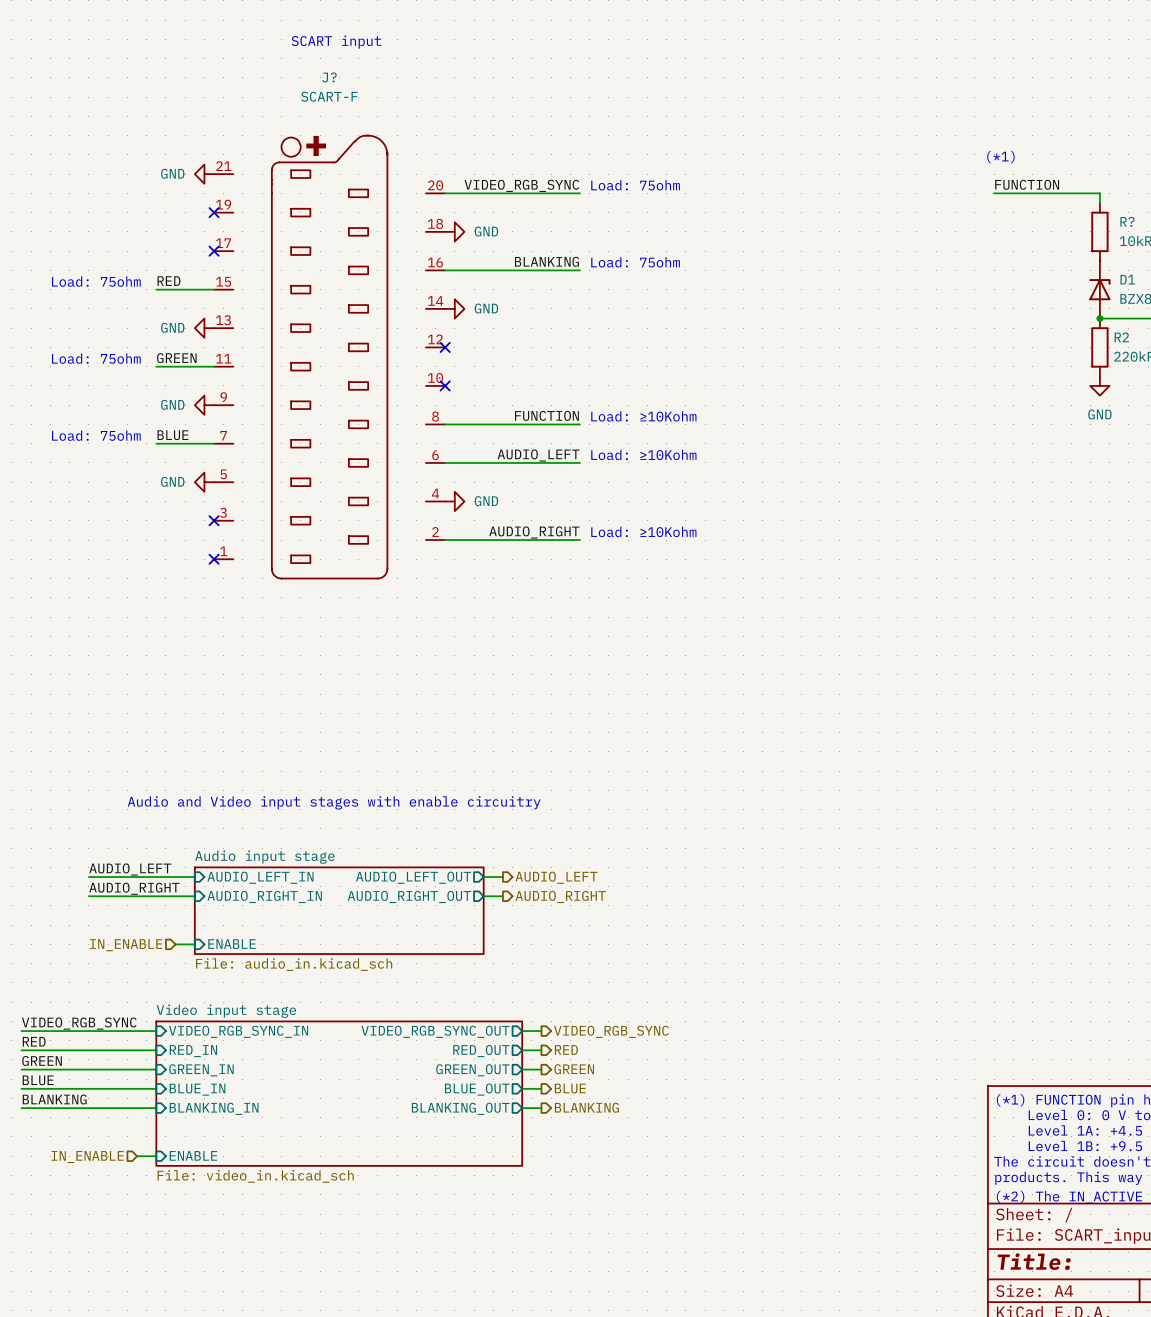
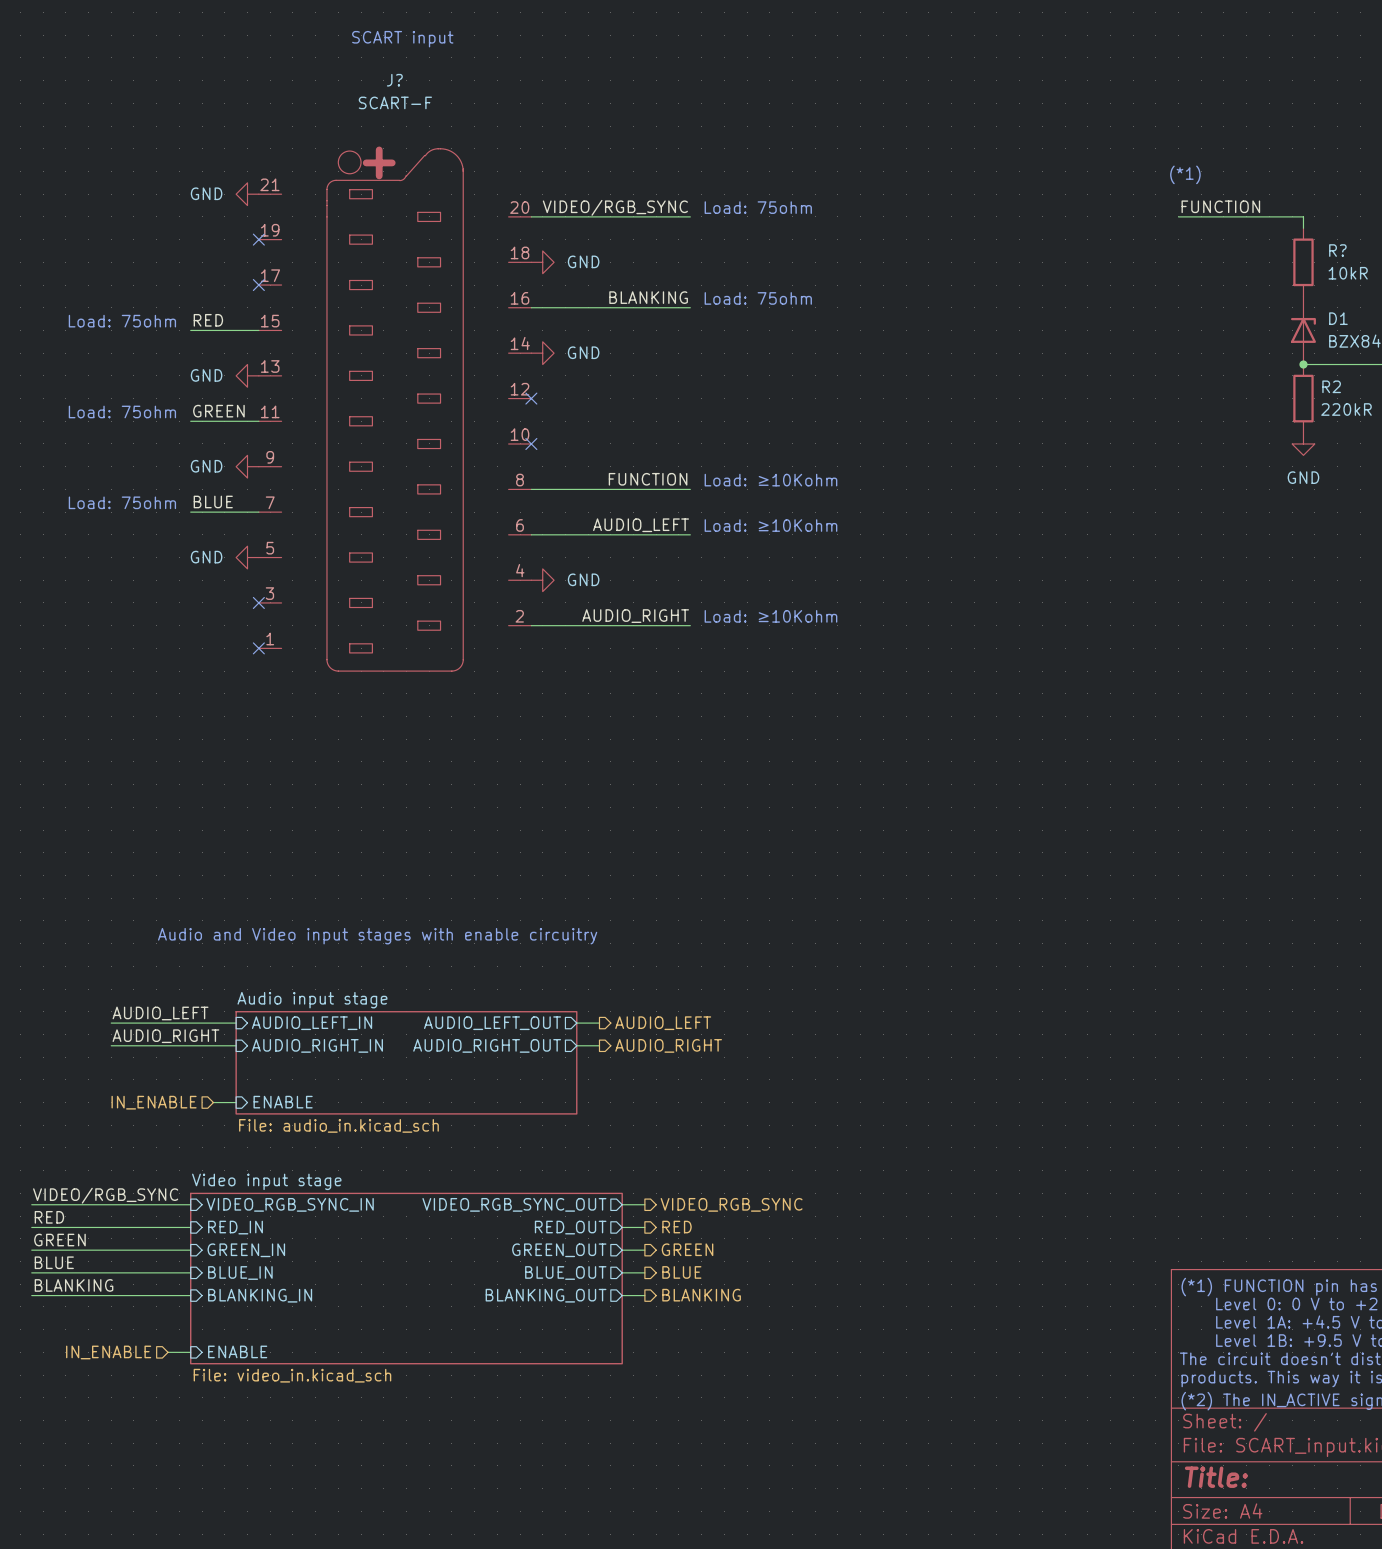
label: VIDEO_RGB_SYNC (521, 185) -> VIDEO/RGB_SYNC (615, 207)
label: VIDEO_RGB_SYNC (79, 1023) -> VIDEO/RGB_SYNC (105, 1195)

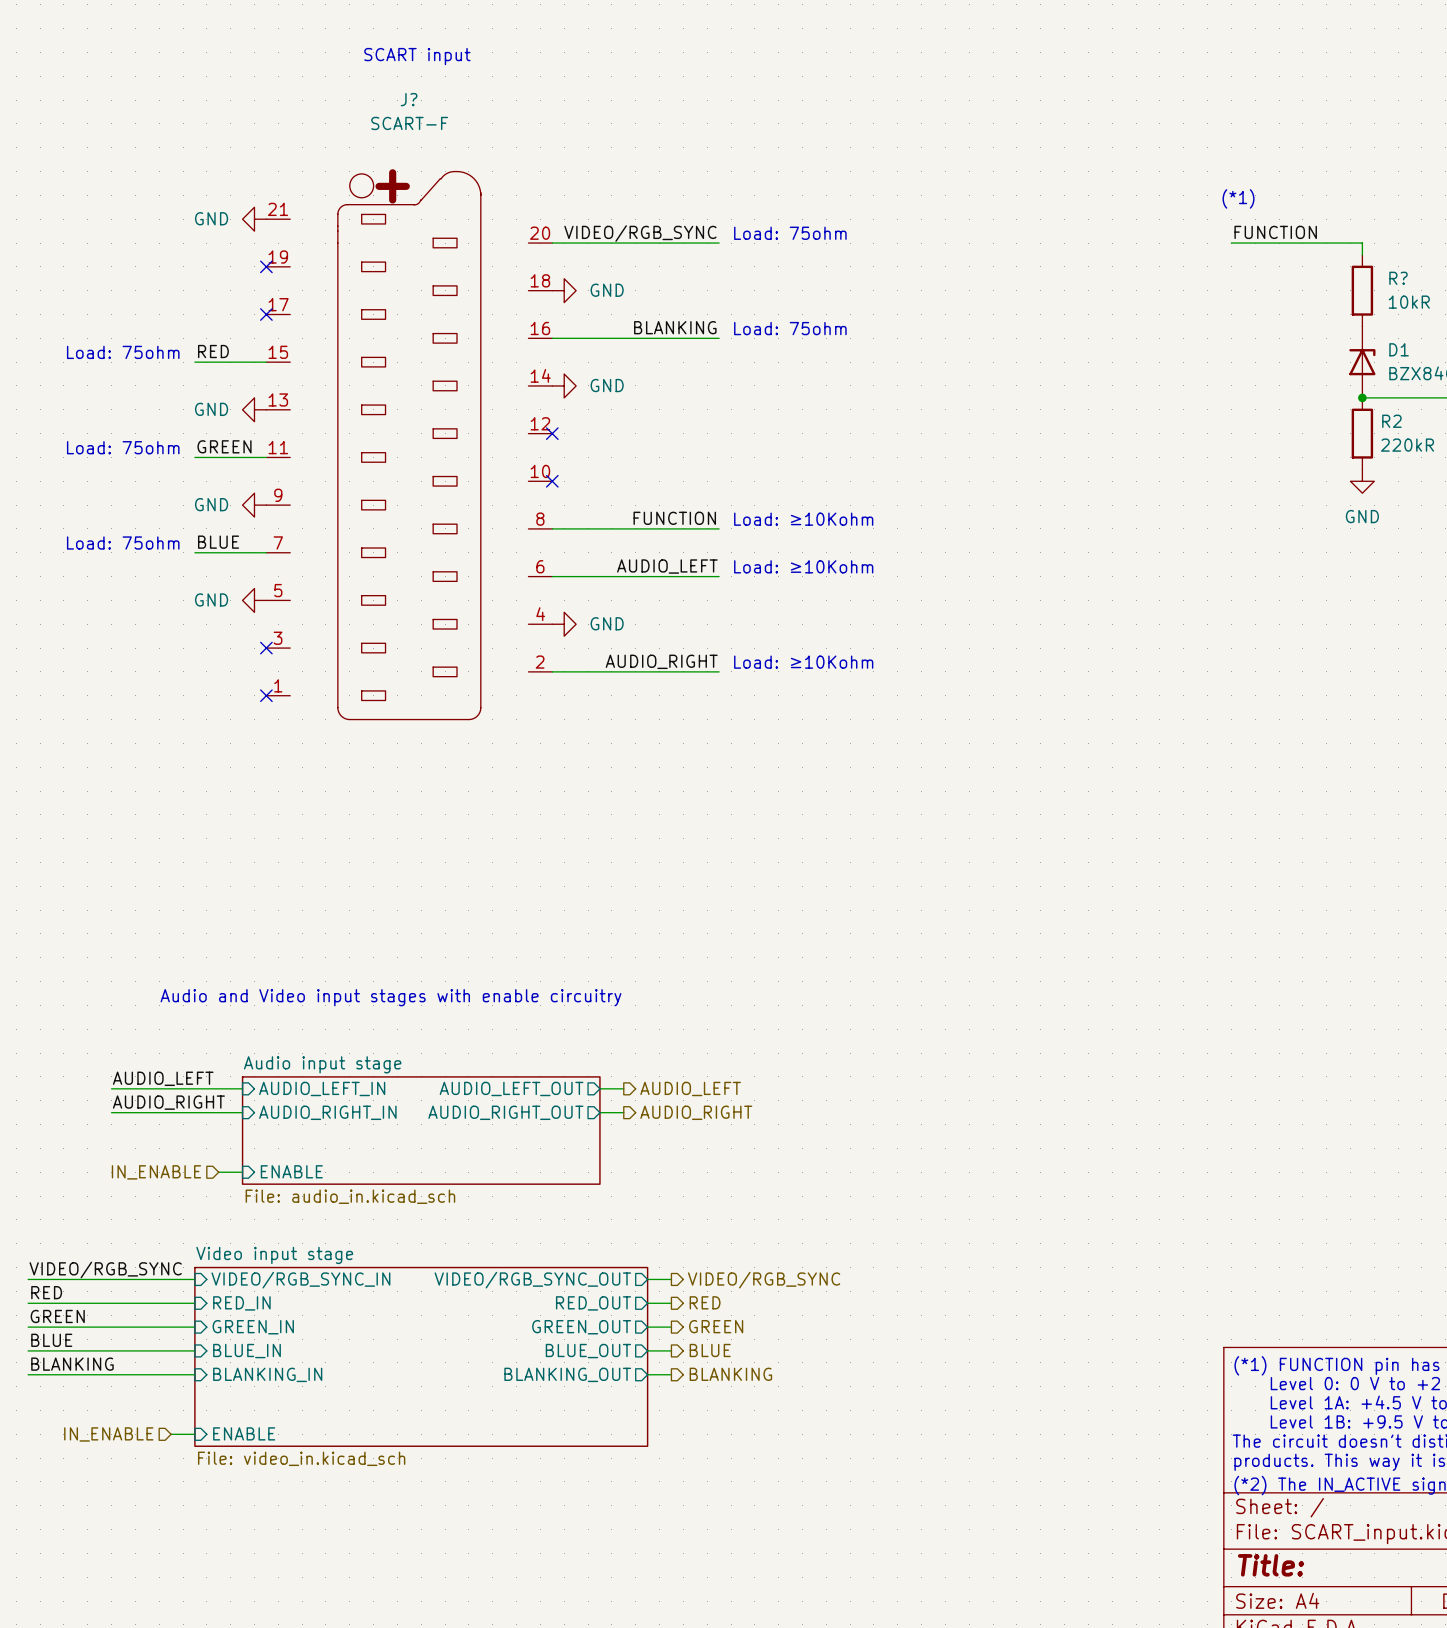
sheet pin: VIDEO_RGB_SYNC_IN (290, 1204) -> VIDEO/RGB_SYNC_IN (300, 1280)
sheet pin: VIDEO_RGB_SYNC_OUT (514, 1204) -> VIDEO/RGB_SYNC_OUT (532, 1280)
hierarchical label: VIDEO_RGB_SYNC (731, 1204) -> VIDEO/RGB_SYNC (764, 1280)

